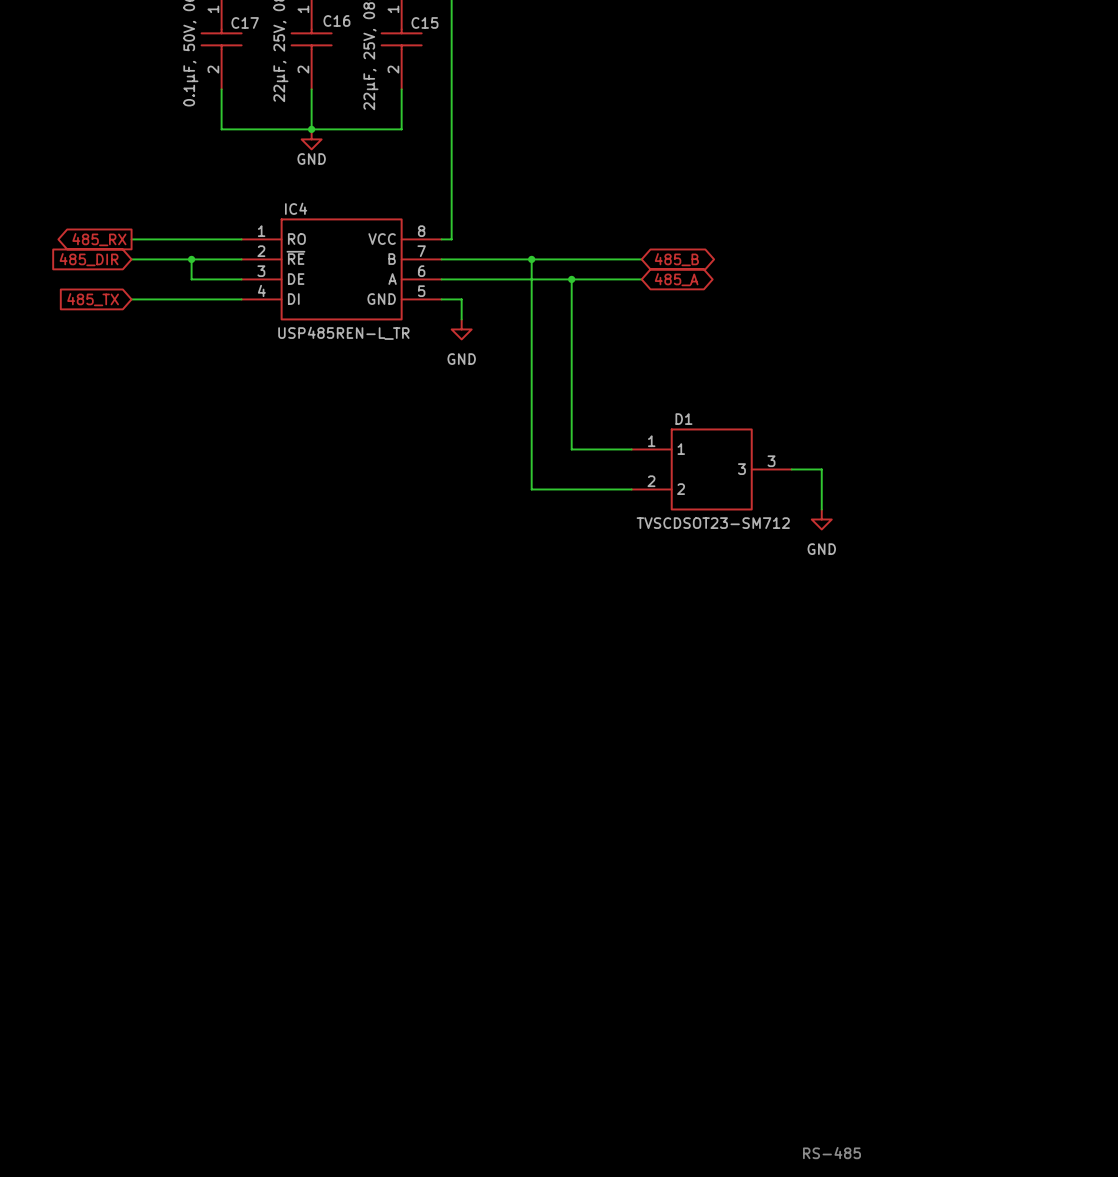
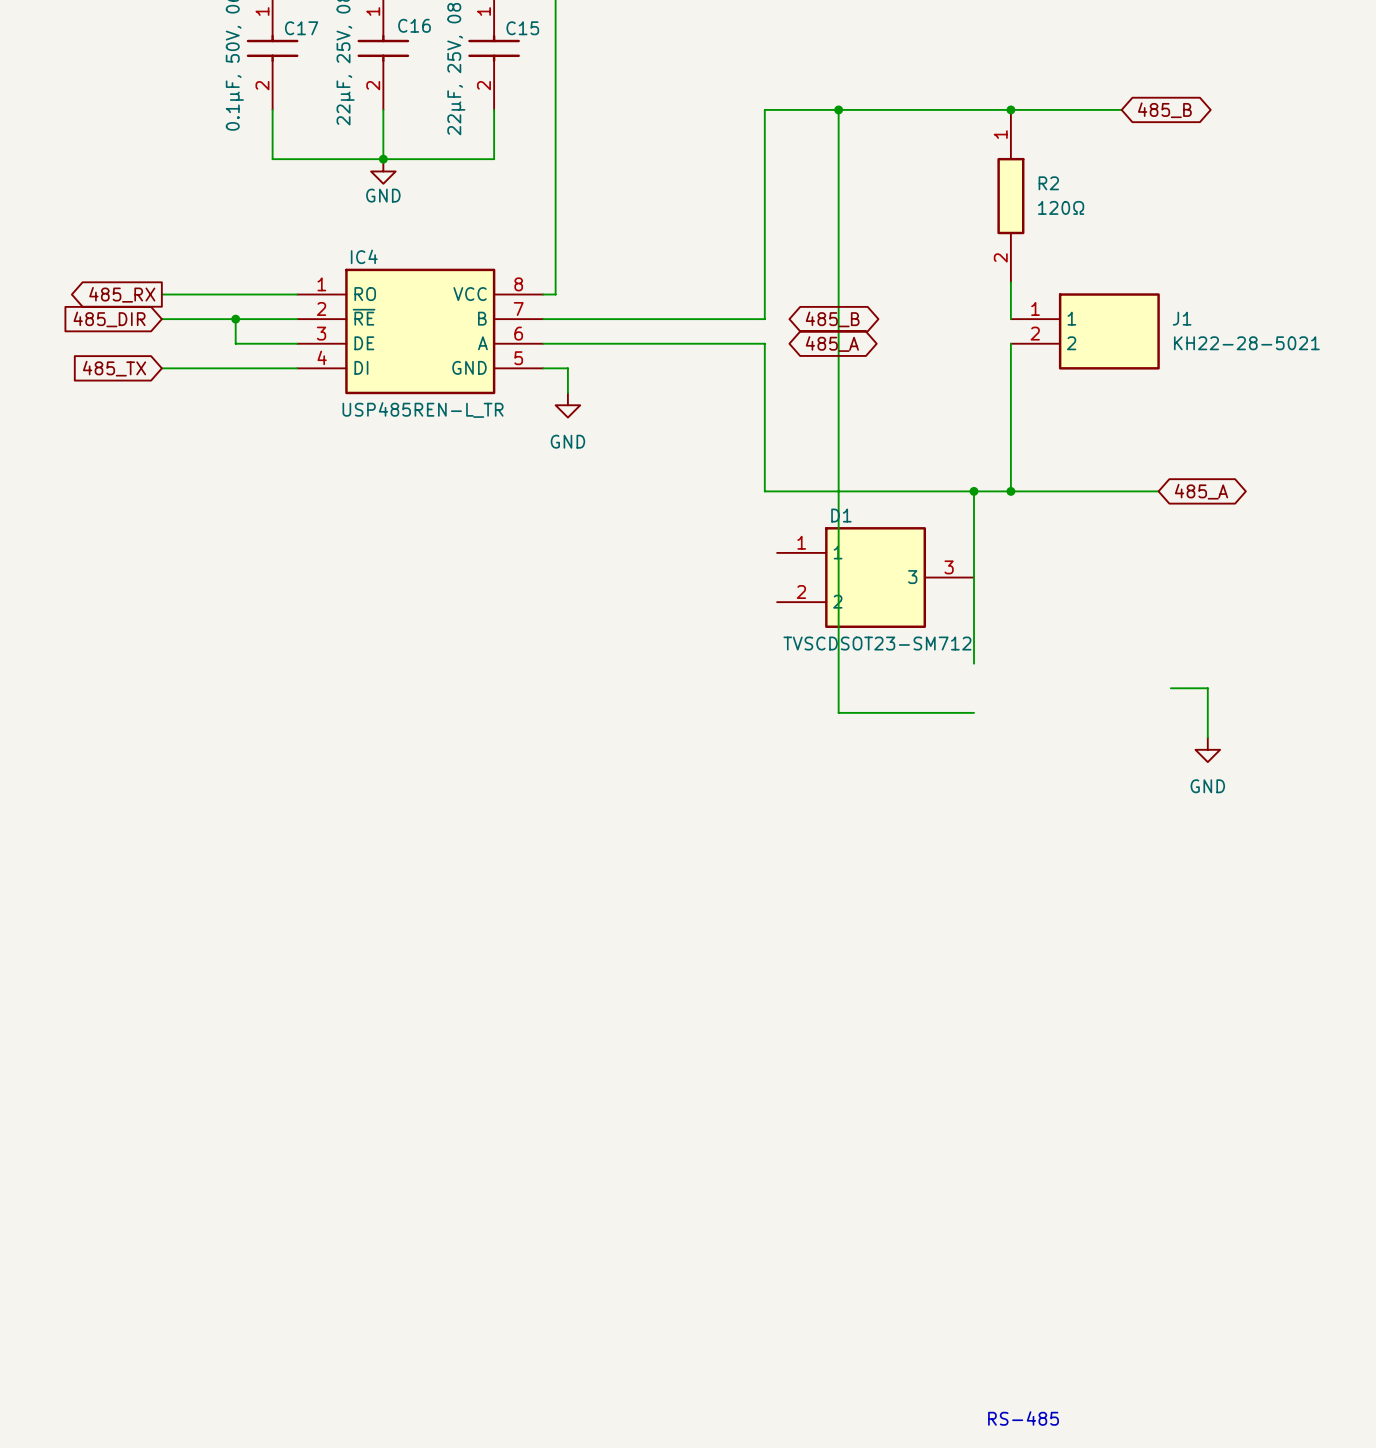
wire: none -> (838, 109) (838, 712) (974, 712)
junction: none -> (838, 109)
junction: none -> (1010, 109)
global label: none -> 485_B (1164, 110)
R2: none -> (1010, 196)
wire: none -> (1010, 282) (1010, 319)
wire: (531, 259) (531, 489) (631, 489) -> none
junction: (531, 259) -> none
wire: (621, 259) (641, 259) -> (764, 319) (764, 109) (1121, 109)
J1: none -> KH22-28-5021 (1085, 331)
wire: (571, 279) (571, 449) (631, 449) -> none
junction: (571, 279) -> none
wire: (621, 279) (641, 279) -> (764, 343) (764, 491) (1158, 491)
wire: none -> (1010, 343) (1010, 491)
wire: none -> (974, 491) (974, 663)
junction: none -> (974, 491)
junction: none -> (1010, 491)
global label: none -> 485_A (1201, 491)
wire: (791, 469) (821, 469) (821, 509) -> (1170, 688) (1207, 688) (1207, 737)
power symbol position: GND (821, 519) -> GND (1207, 749)

